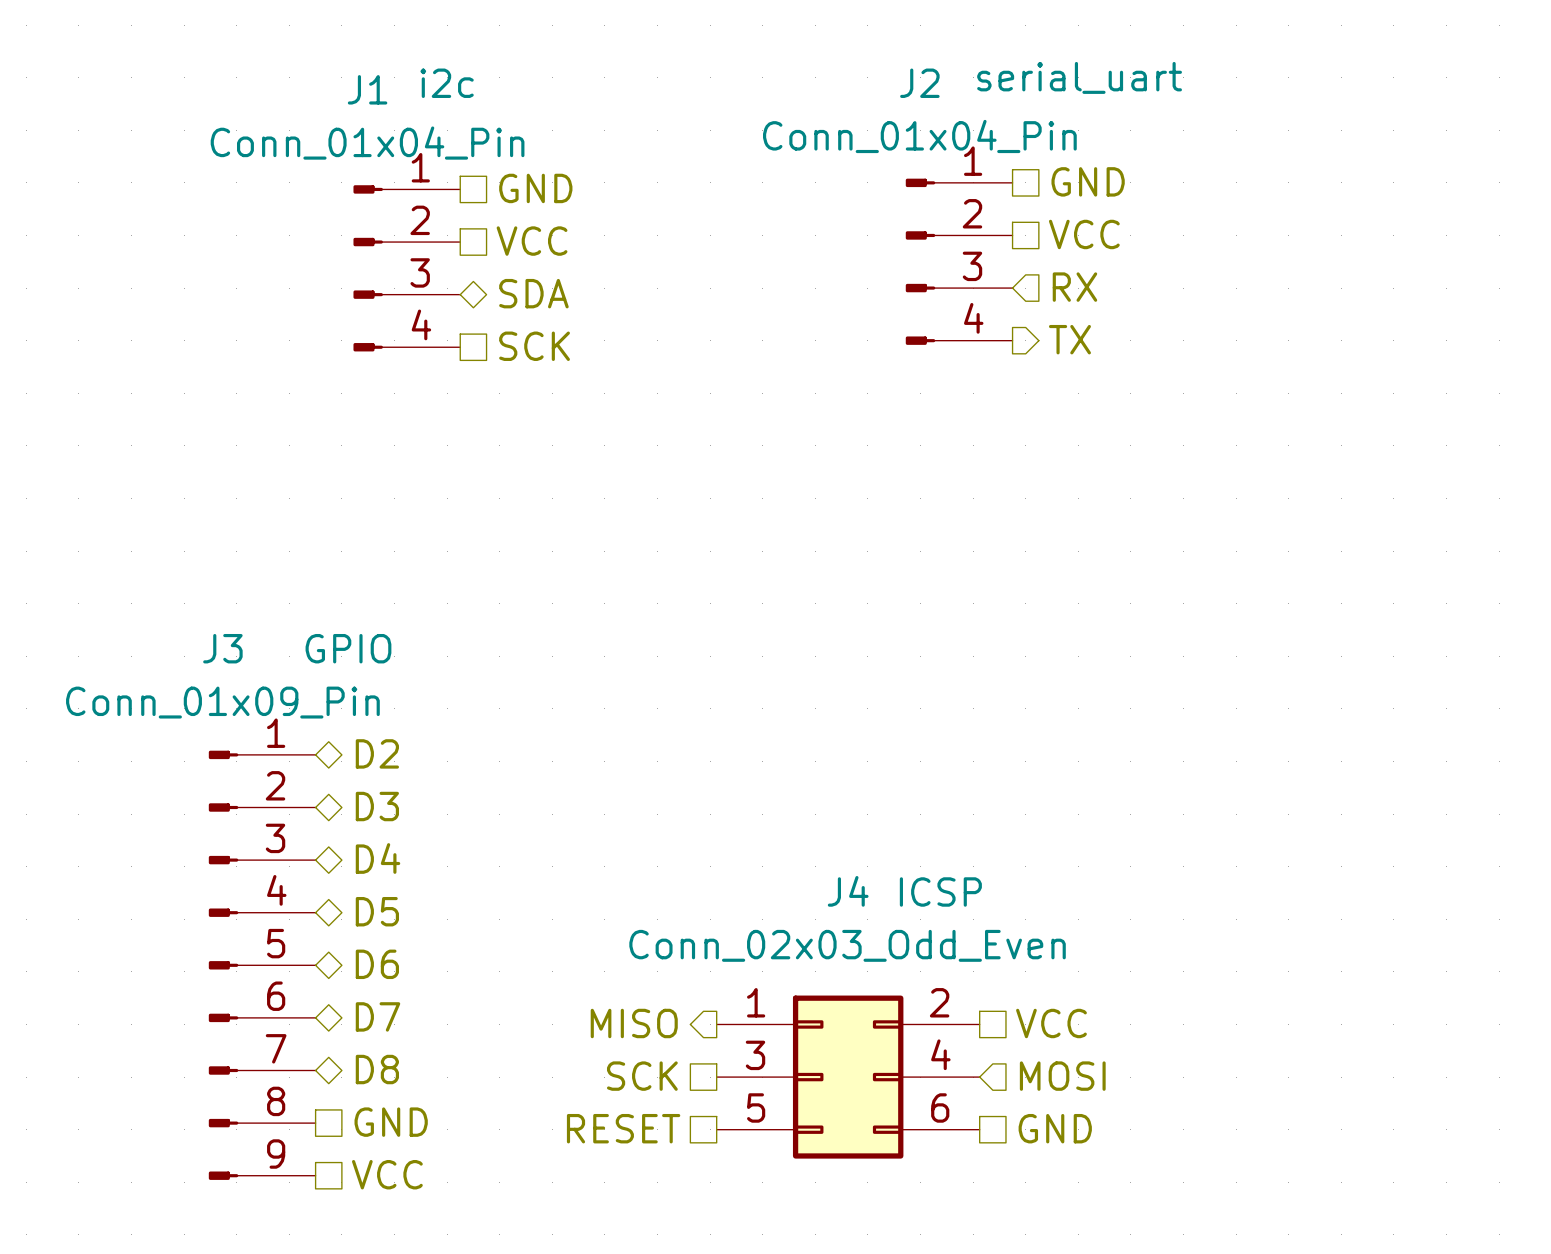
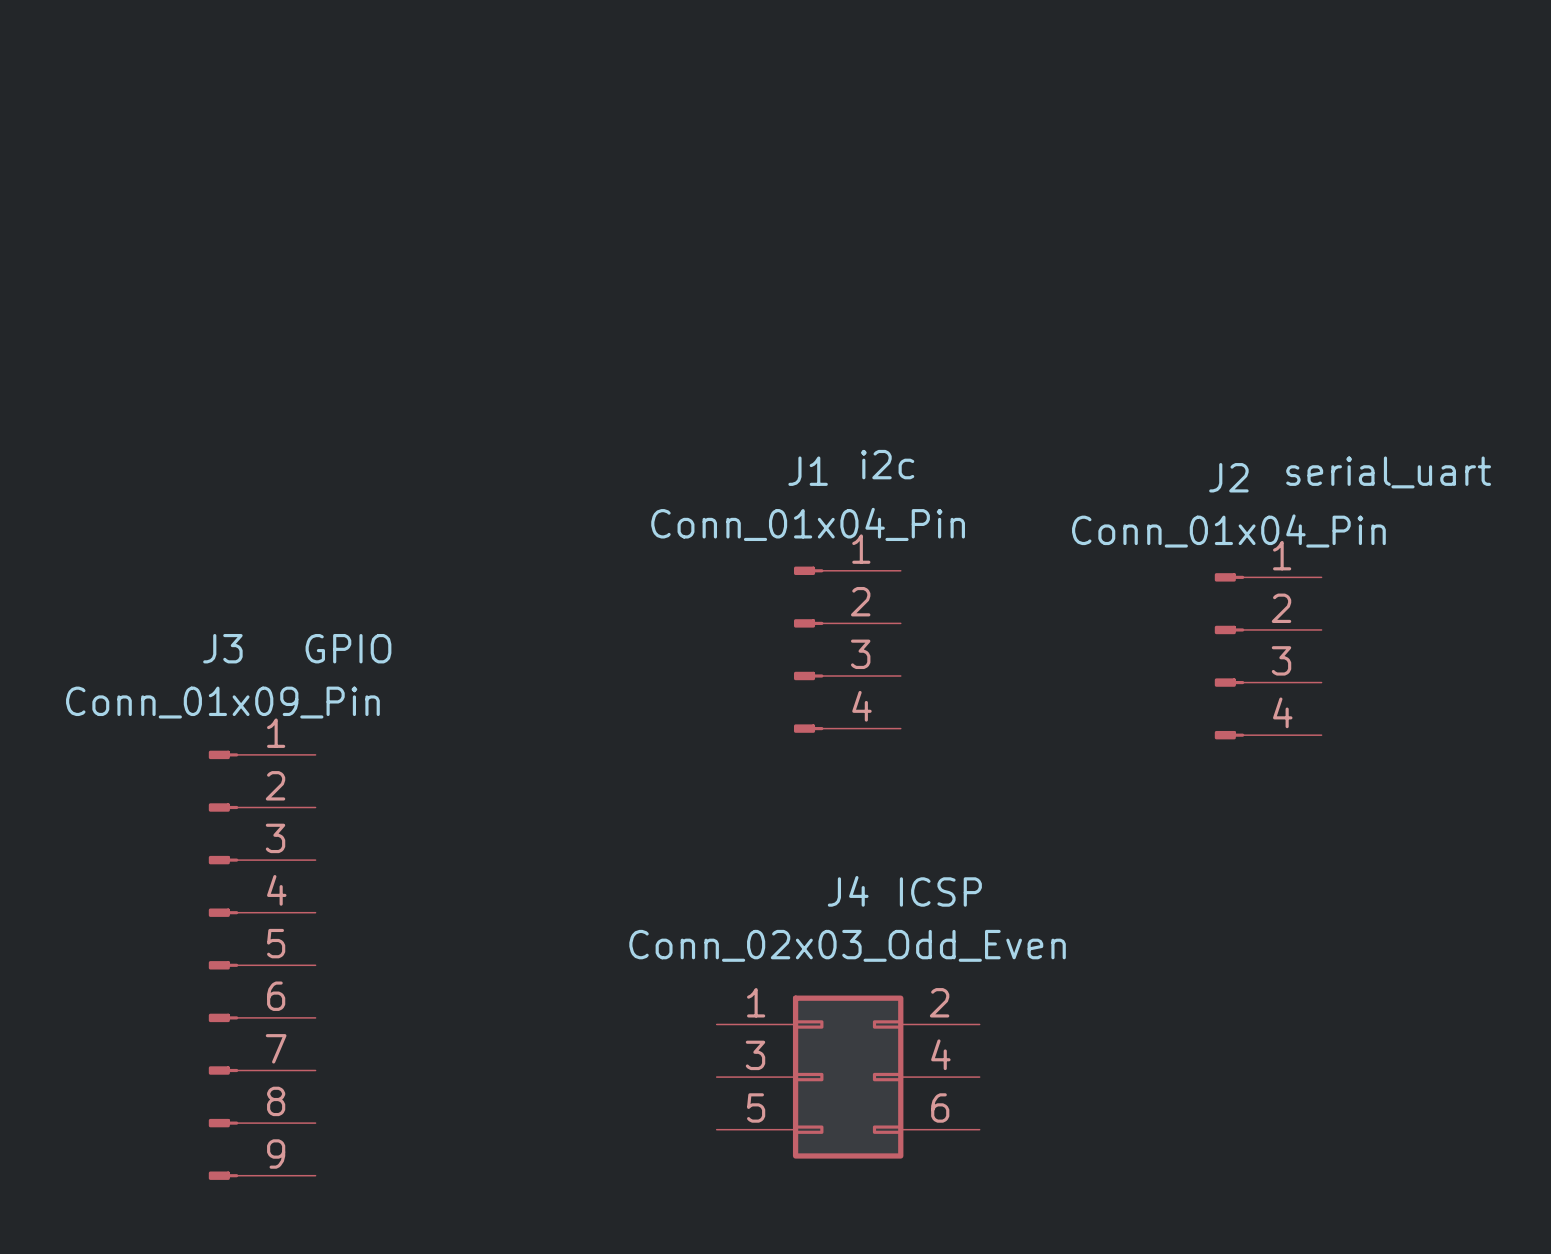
hierarchical label: GND (1088, 181) -> none
J1 symbol: [353, 185, 461, 352] -> [794, 566, 901, 733]
hierarchical label: GND (535, 188) -> none
hierarchical label: VCC (1084, 234) -> none
hierarchical label: VCC (532, 241) -> none
J2 position: (959, 261) -> (1268, 656)
hierarchical label: RX (1074, 287) -> none
hierarchical label: SDA (533, 293) -> none
hierarchical label: TX (1069, 339) -> none
hierarchical label: SCK (534, 346) -> none
hierarchical label: D2 (377, 753) -> none
hierarchical label: D3 (377, 806) -> none
hierarchical label: D4 (378, 858) -> none
hierarchical label: D5 (377, 911) -> none
hierarchical label: D6 (377, 964) -> none
hierarchical label: D7 (378, 1016) -> none
hierarchical label: MISO (634, 1023) -> none
hierarchical label: VCC (1051, 1023) -> none
hierarchical label: D8 (377, 1069) -> none
hierarchical label: SCK (642, 1076) -> none
hierarchical label: MOSI (1062, 1076) -> none
hierarchical label: GND (391, 1122) -> none
hierarchical label: RESET (623, 1128) -> none
hierarchical label: GND (1055, 1128) -> none
hierarchical label: VCC (387, 1174) -> none

